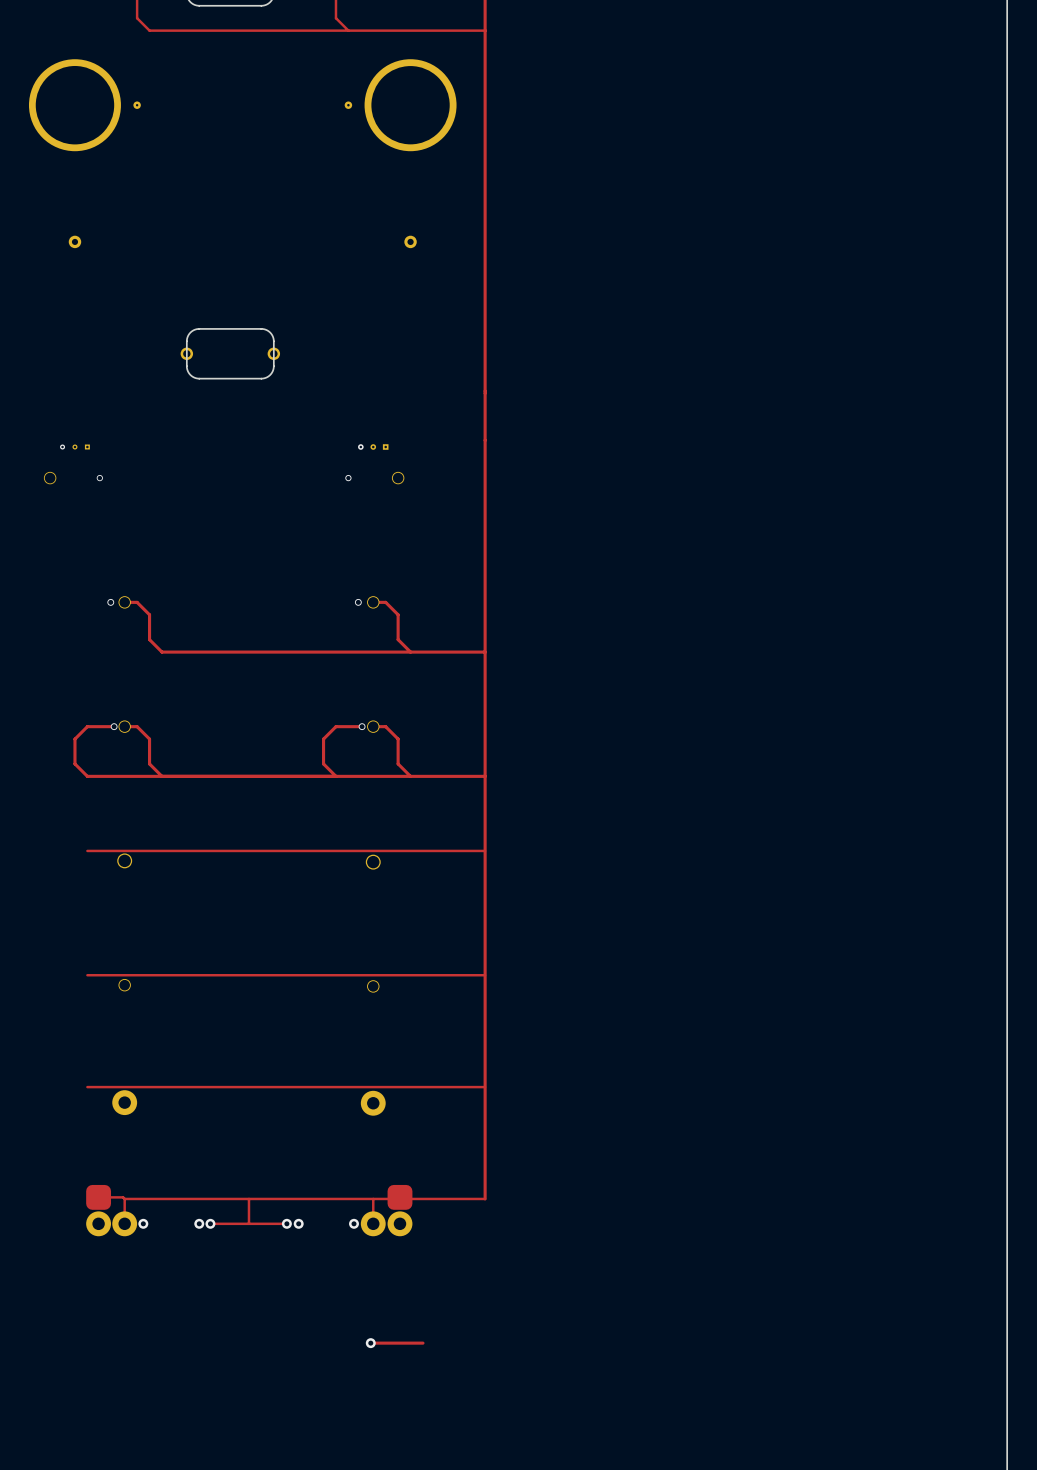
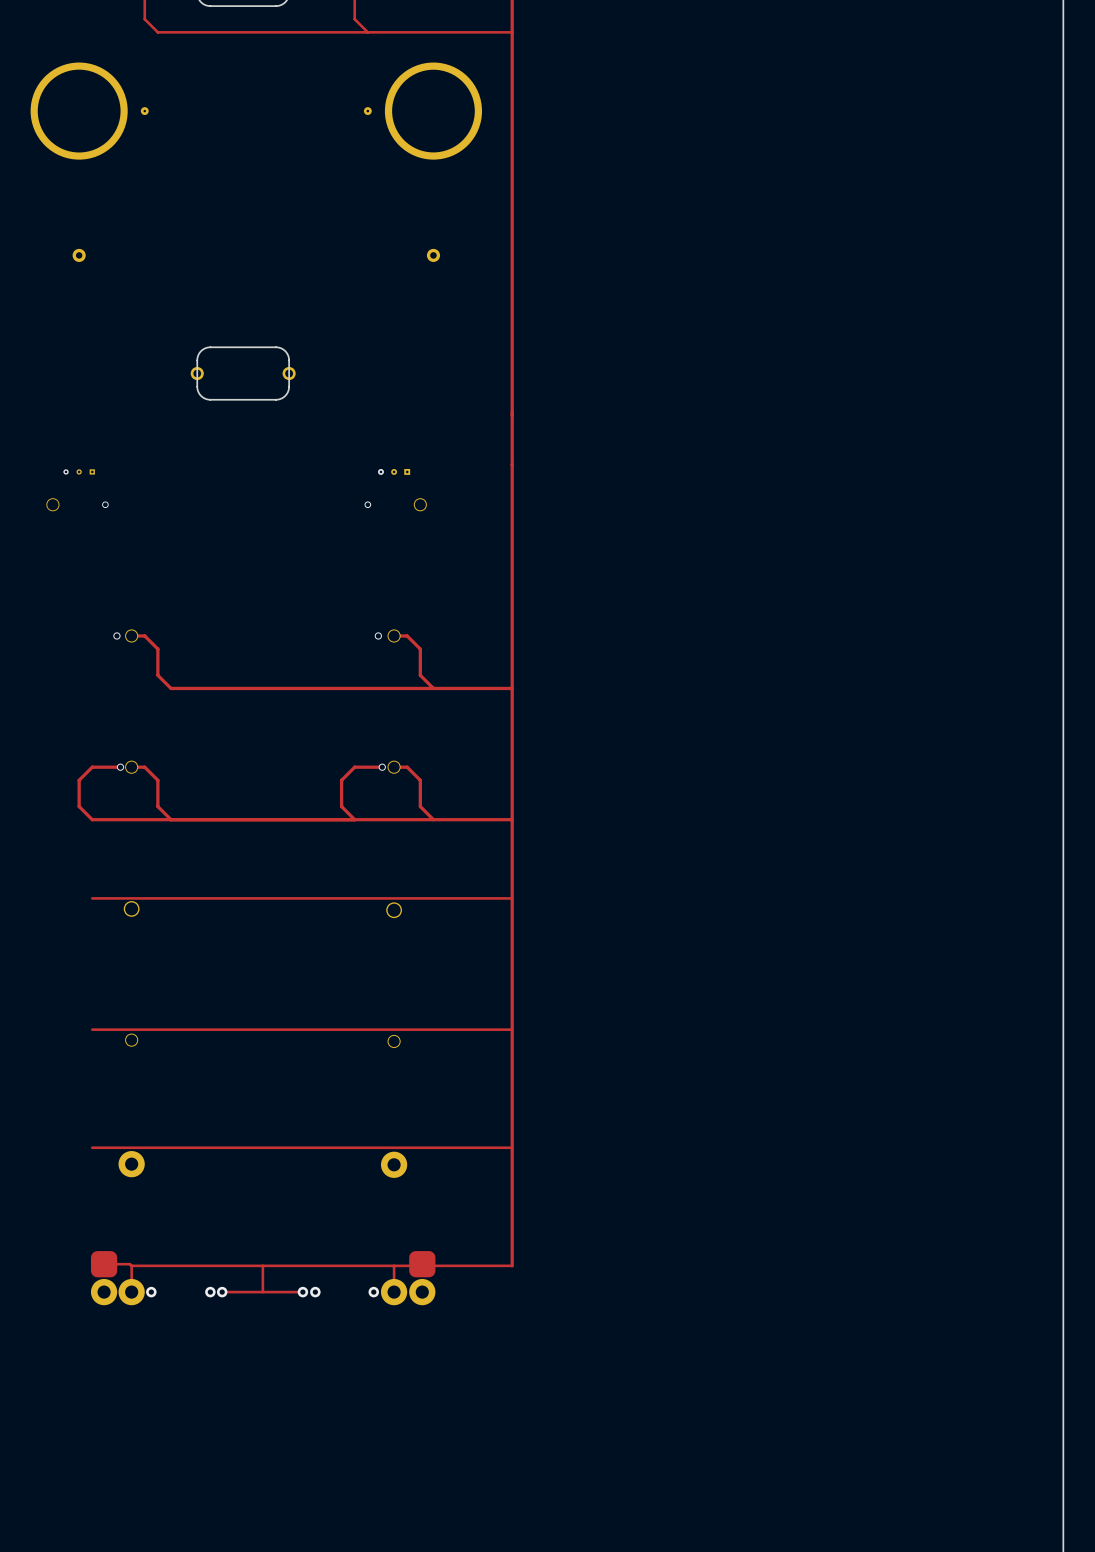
track: (370, 1343) (422, 1343) -> none
via: (370, 1343) -> none

